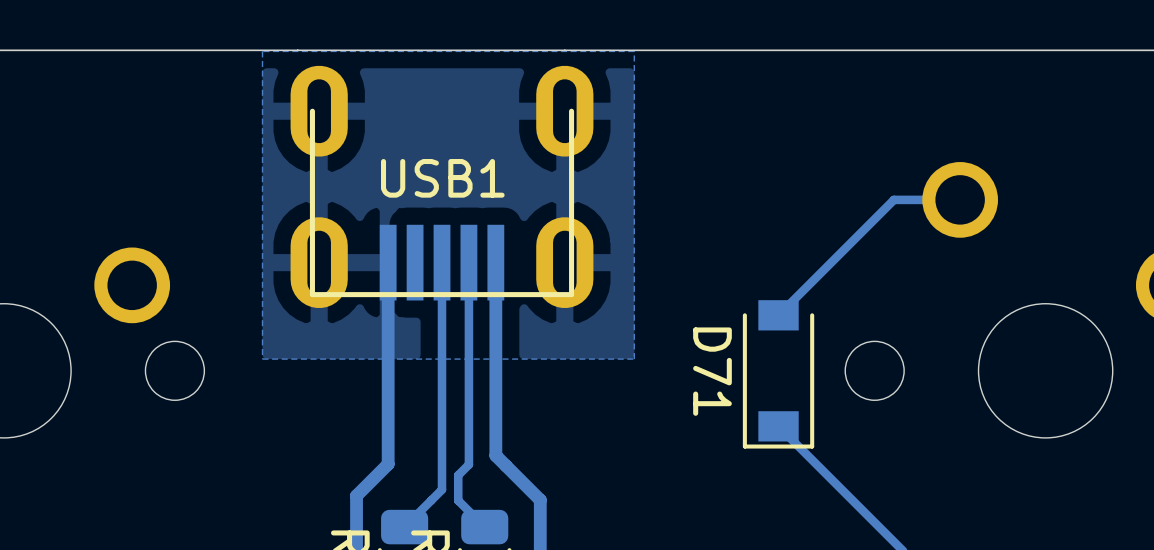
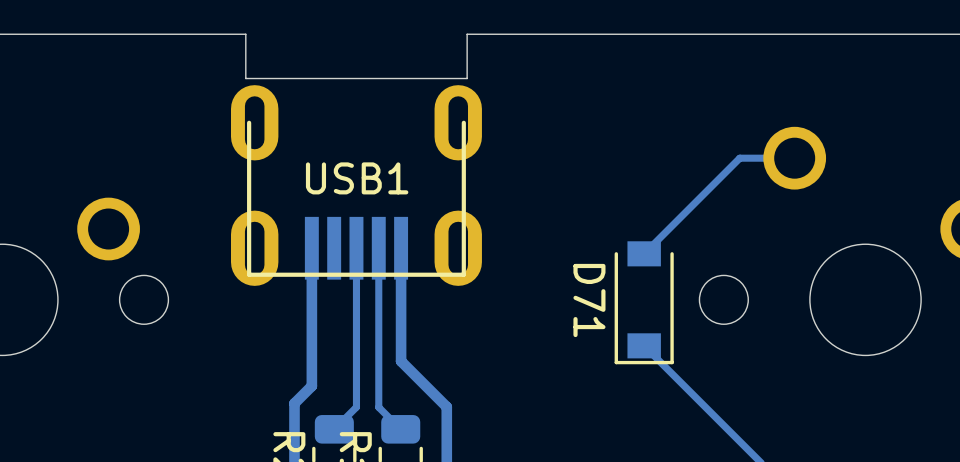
board edge: (564, 50) (297, 50) -> (467, 34) (467, 78) (245, 78) (245, 34)
zone outline: (634, 51) (634, 359) (262, 359) (262, 51) (634, 51) -> none
USB1 position: (442, 186) -> (356, 185)
track: (388, 262) (388, 464) (377, 474) -> (311, 248) (311, 386)
track: (442, 262) (442, 489) (431, 500) -> (356, 248) (356, 407)
track: (468, 262) (468, 464) (458, 475) -> (378, 248) (378, 386)
track: (495, 262) (495, 455) -> (401, 248) (401, 361) (409, 370)

